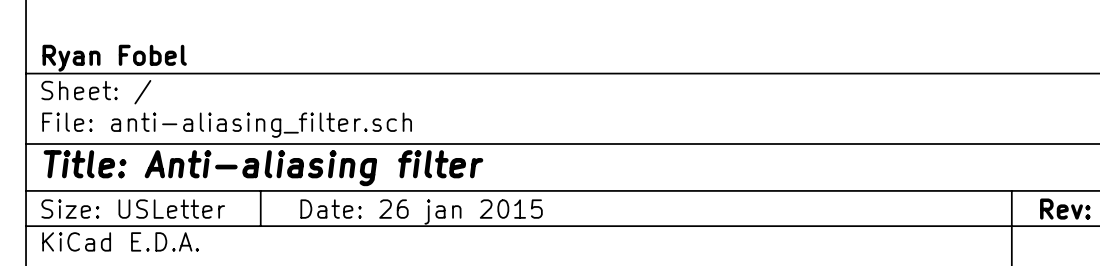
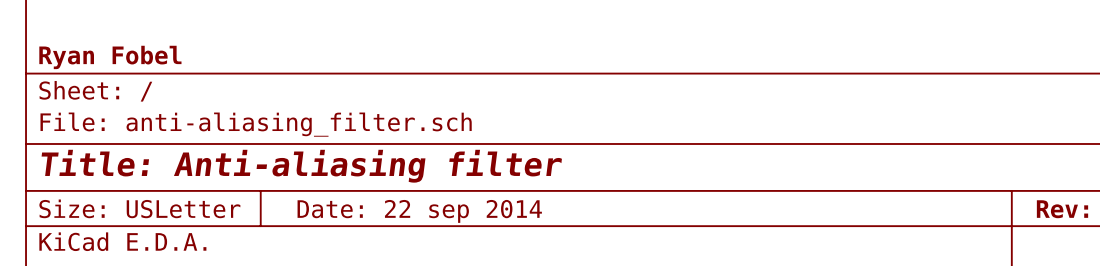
title block: Date: 26 jan 2015 (421, 211) -> Date: 22 sep 2014 (419, 211)

